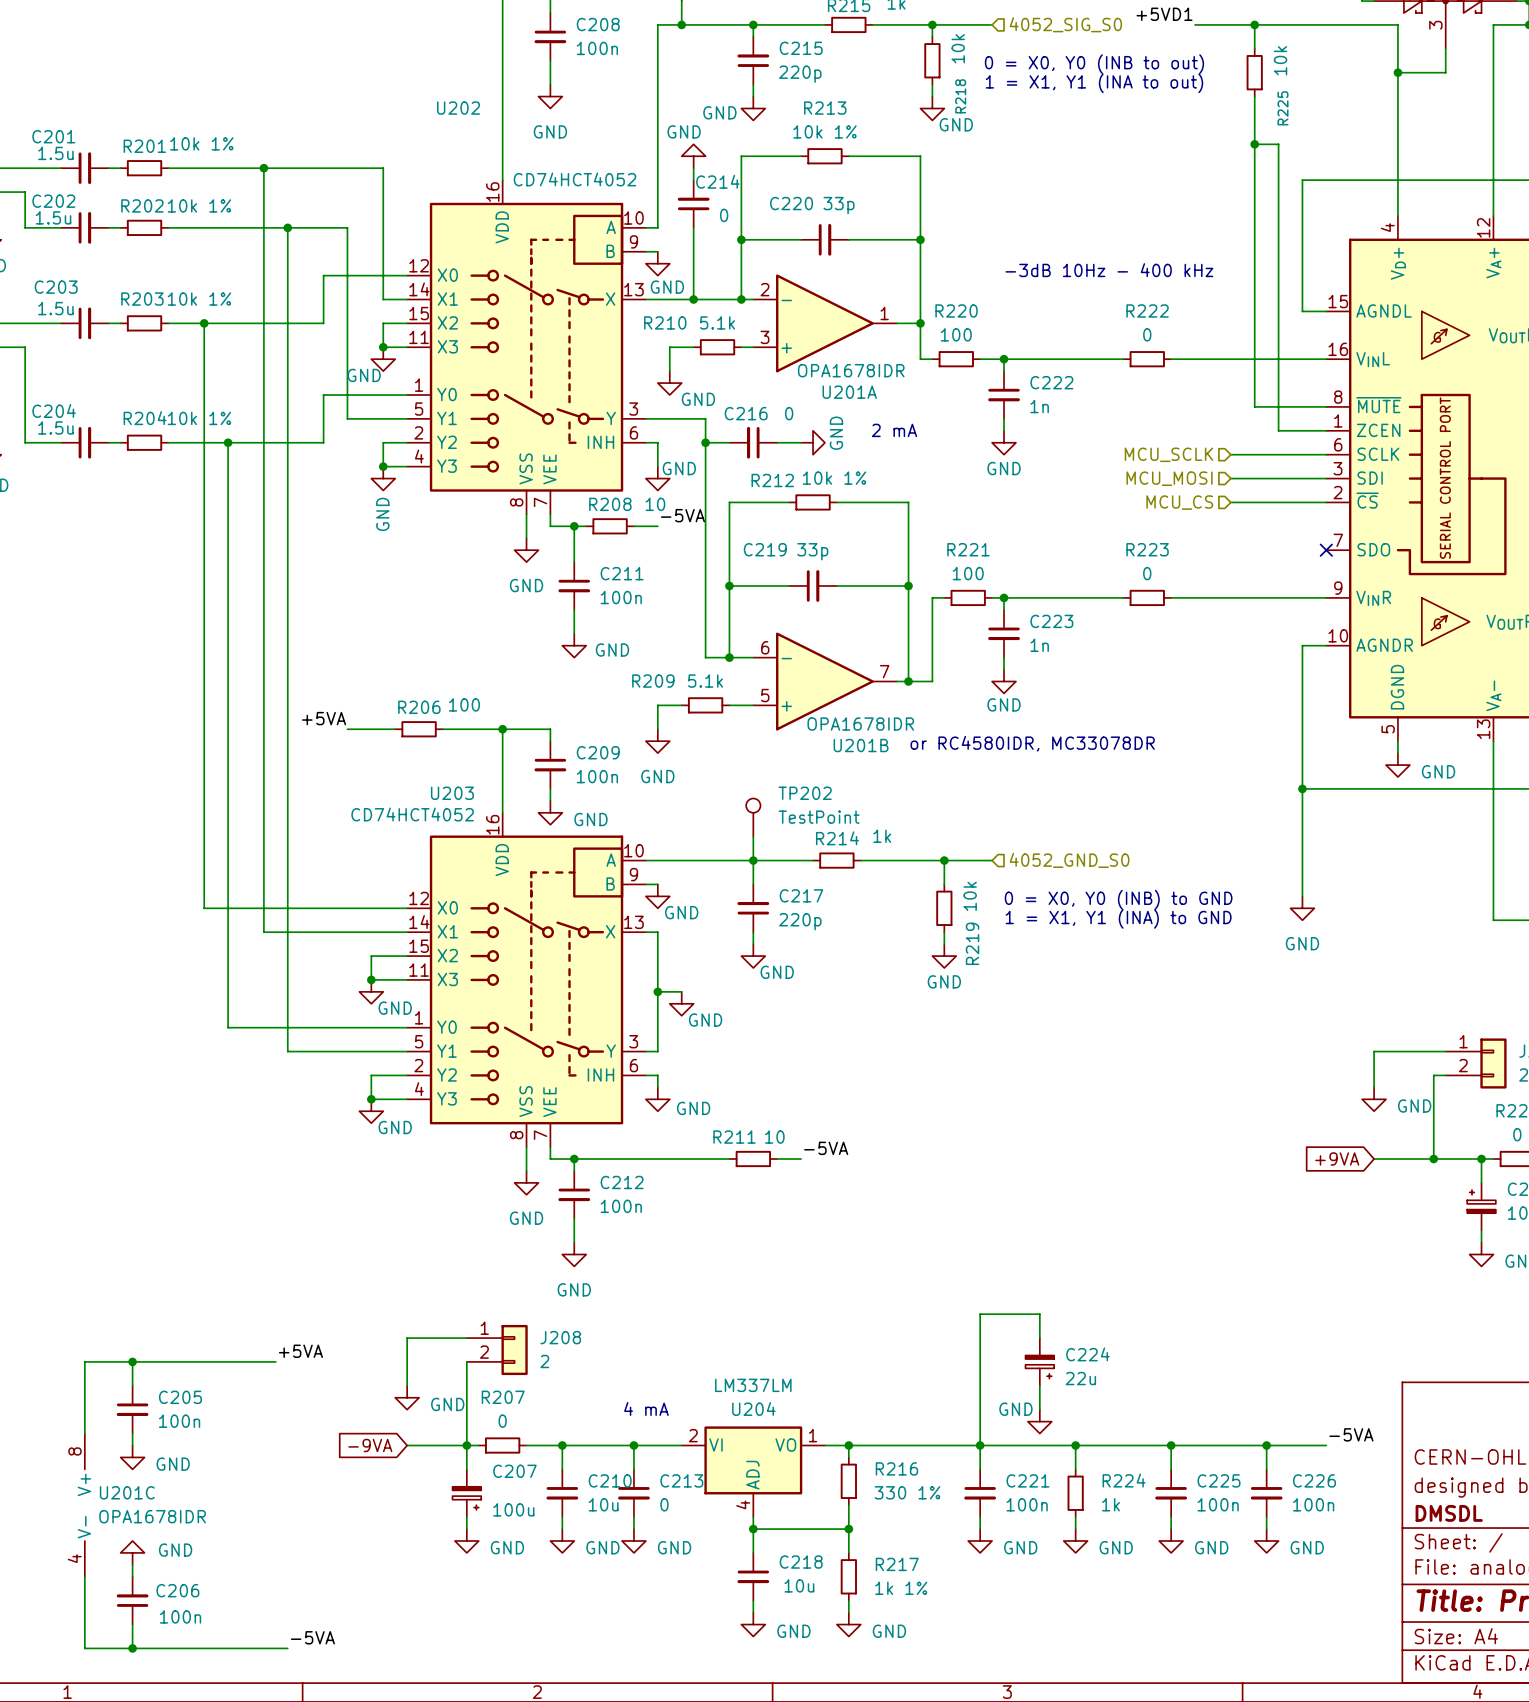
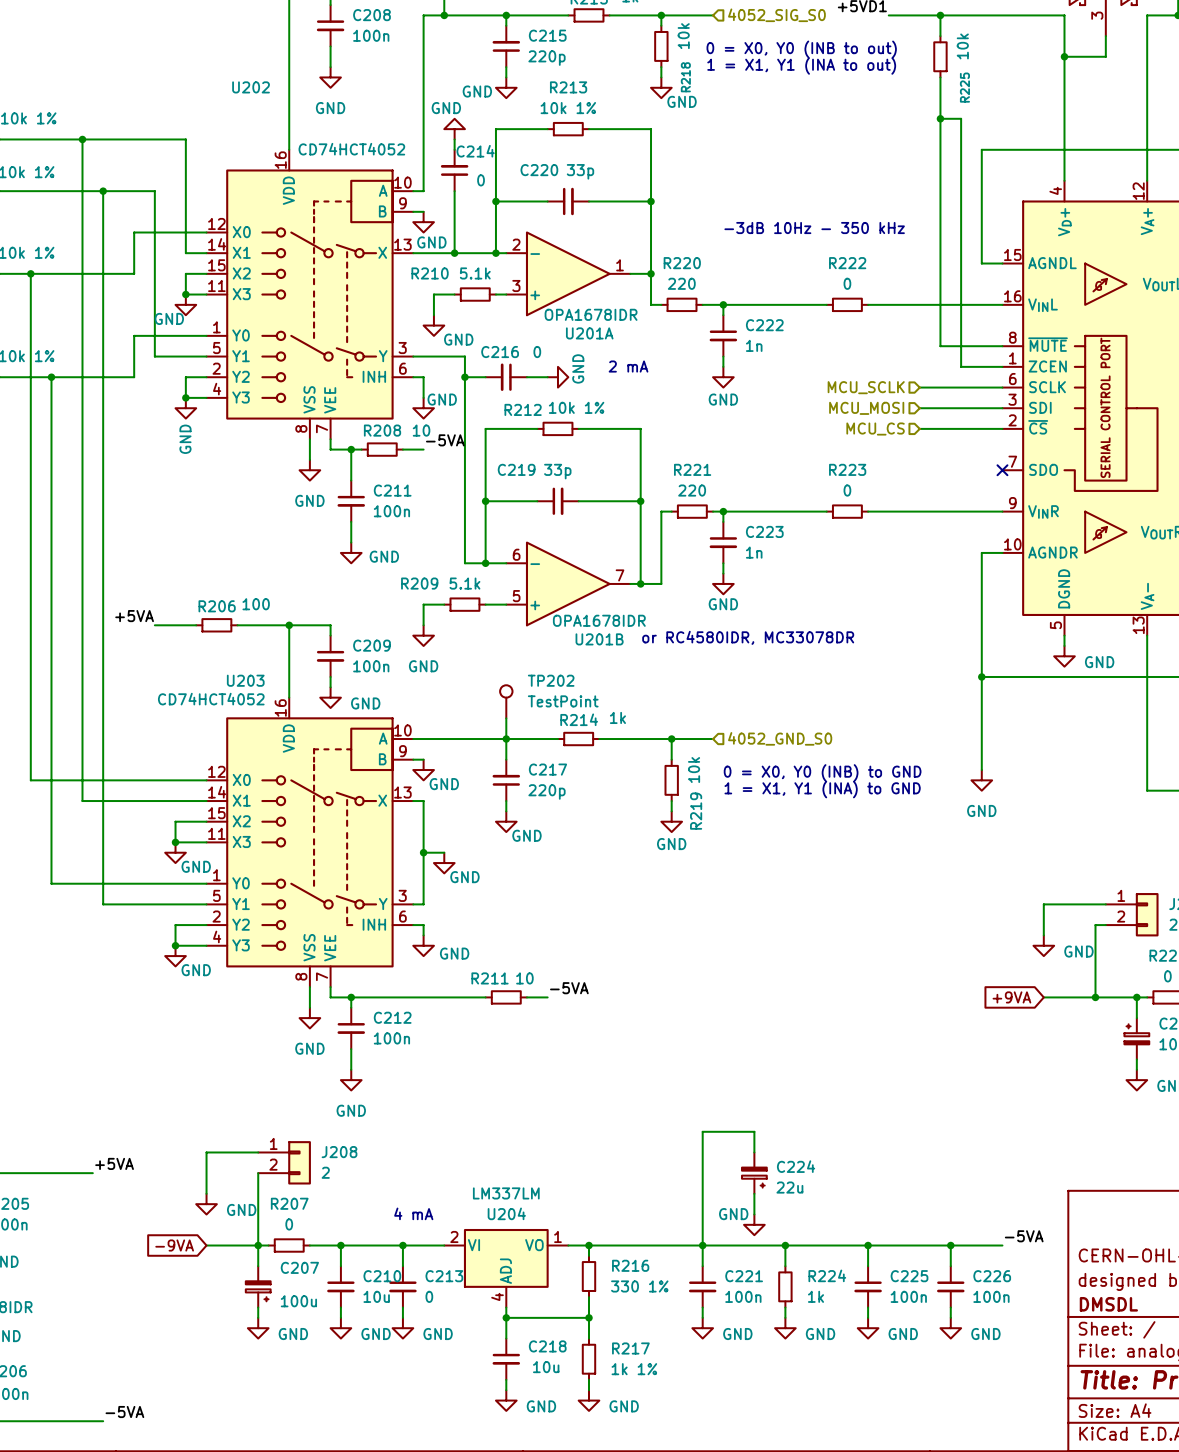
text: -3dB 10Hz - 400 kHz (1109, 270) -> -3dB 10Hz - 350 kHz (814, 228)
R220 value: 100 (956, 334) -> 220 (681, 283)
R221 value: 100 (968, 573) -> 220 (692, 490)

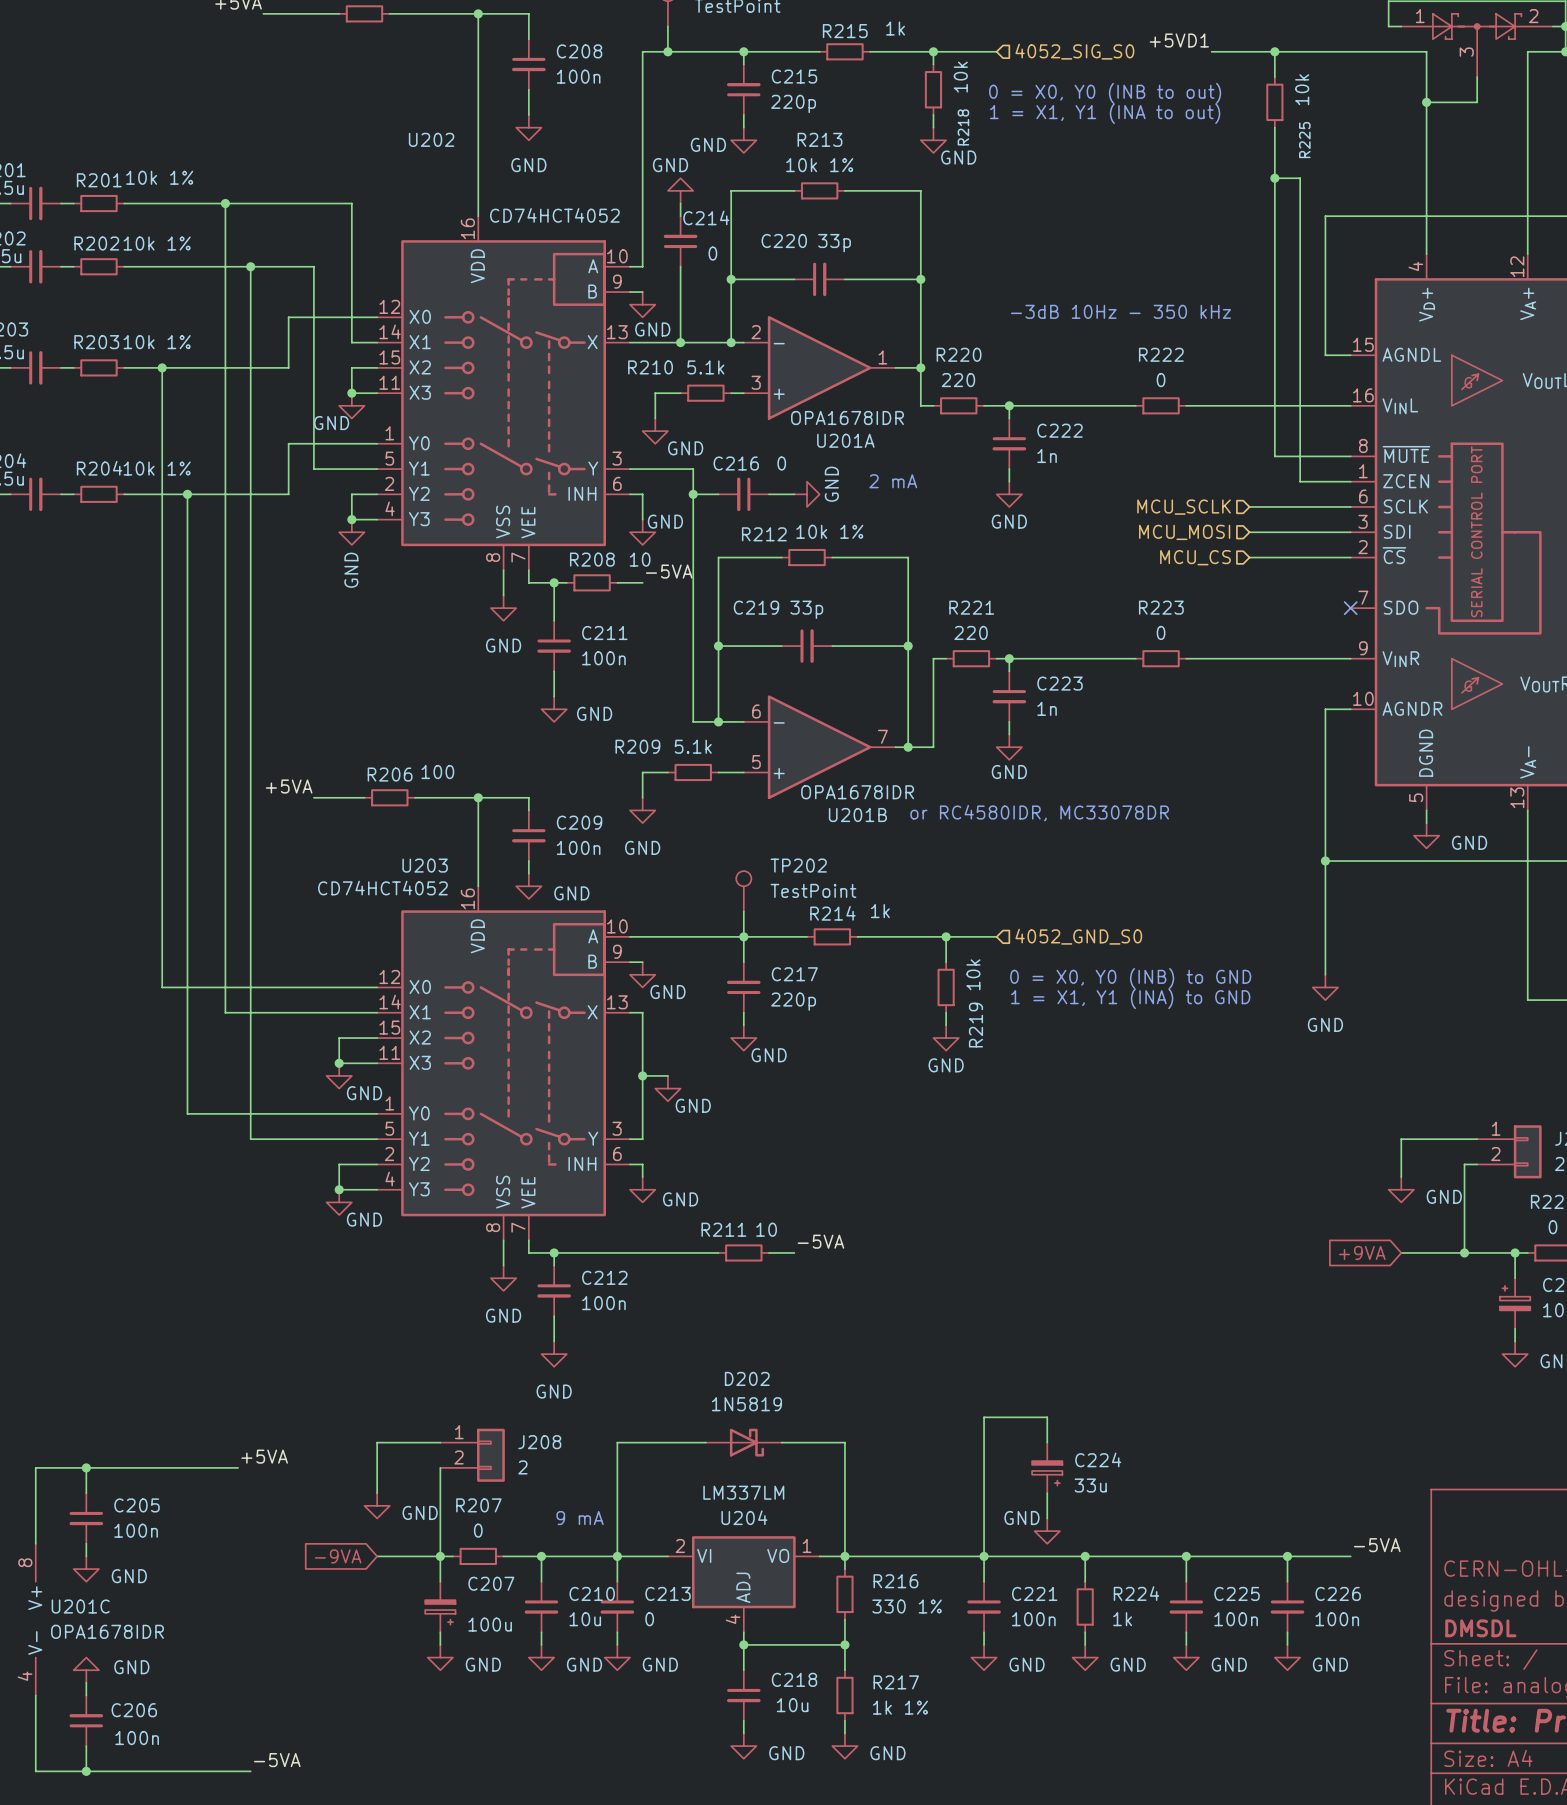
wire: none -> (705, 1442) (617, 1442) (617, 1556)
D202: none -> 1N5819 (743, 1442)
wire: none -> (781, 1442) (844, 1442) (844, 1556)
C224 value: 22u (789, 1187) -> 33u (1090, 1485)
text: 4 mA (413, 1213) -> 9 mA (580, 1518)

